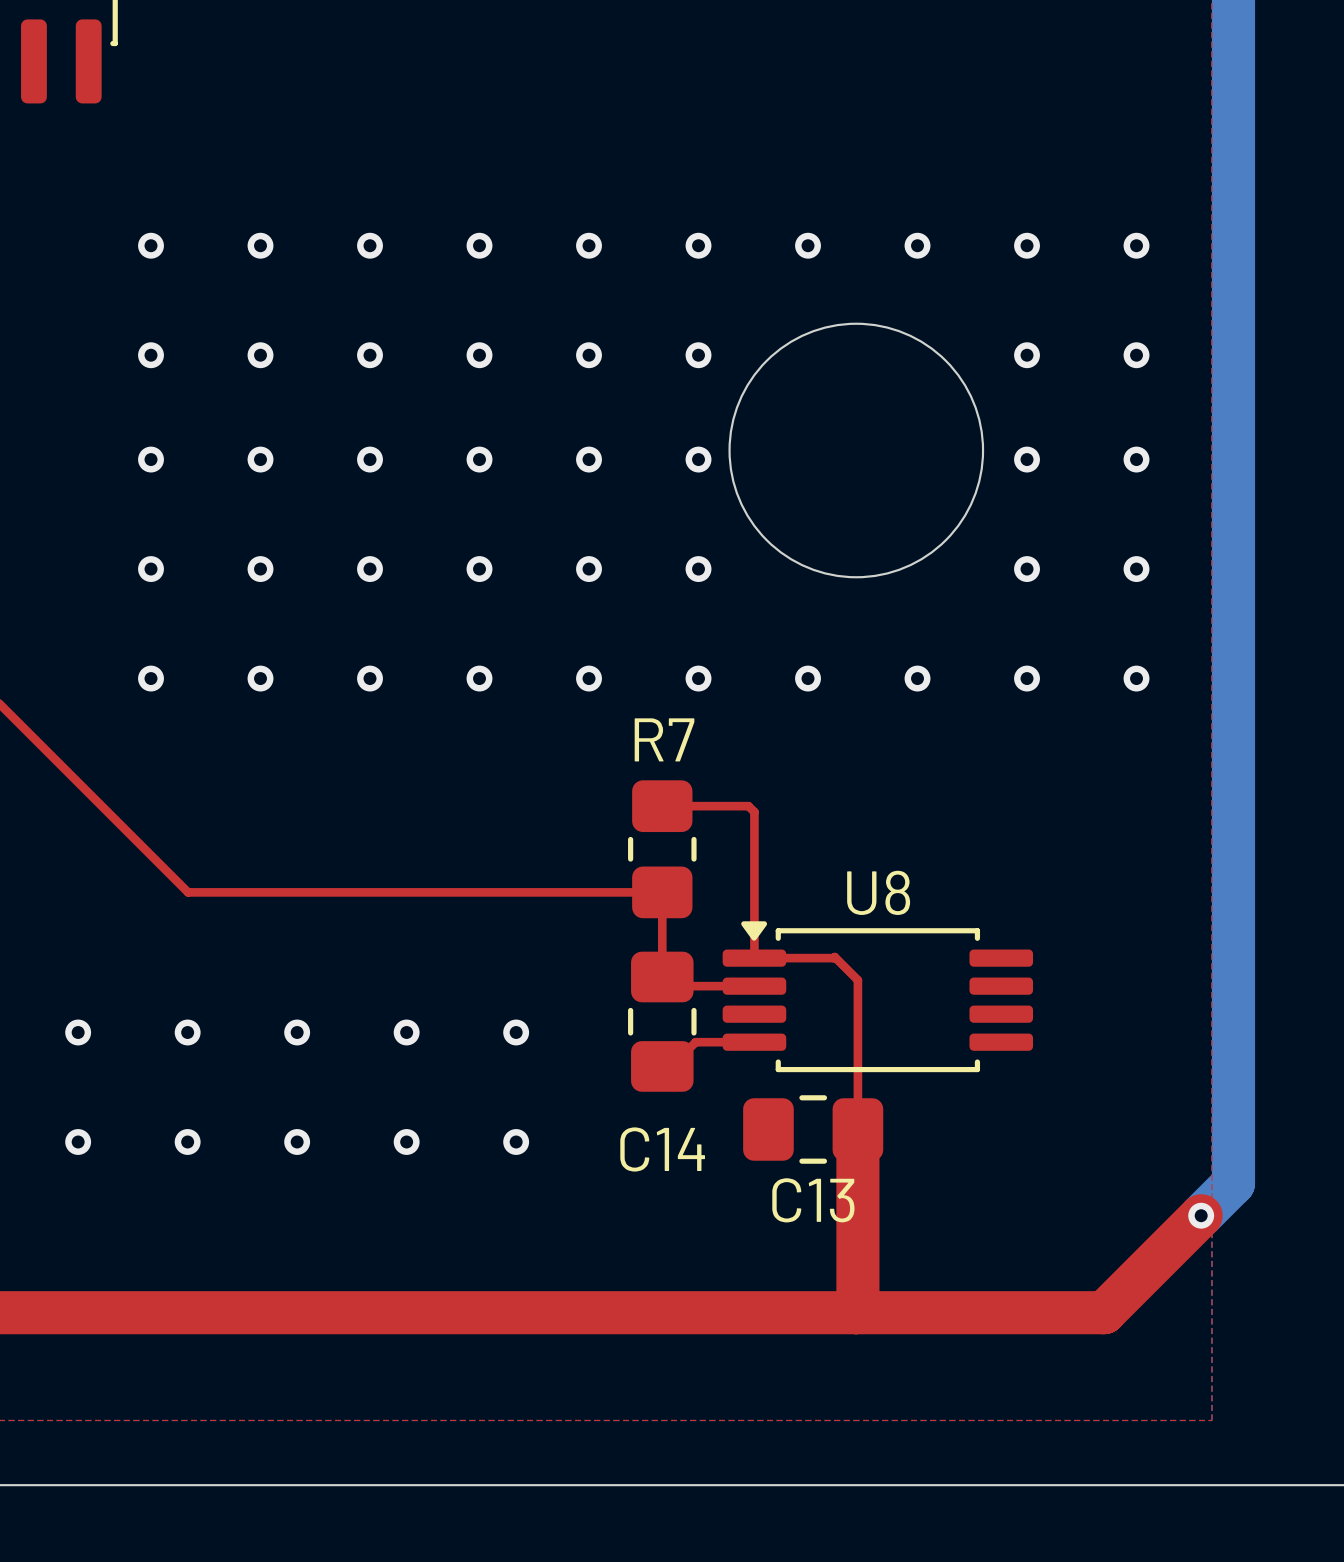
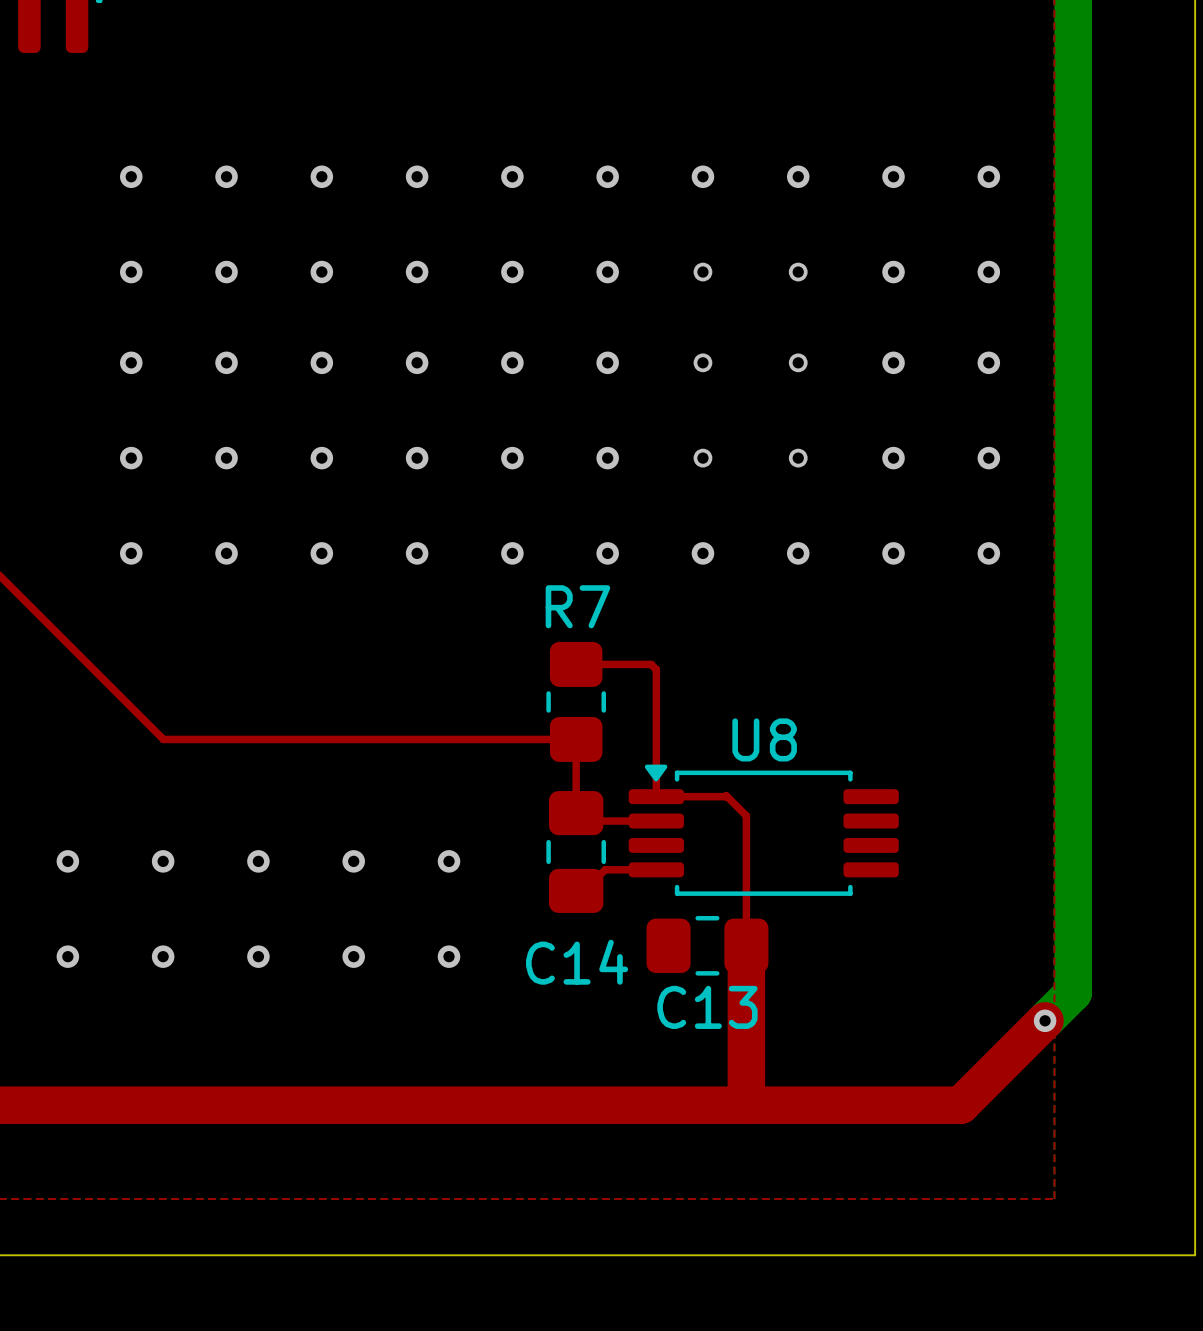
round board edge: [728, 322, 985, 579] -> none
via: none -> (702, 272)
via: none -> (798, 272)
via: none -> (702, 362)
via: none -> (798, 362)
via: none -> (702, 458)
via: none -> (798, 458)

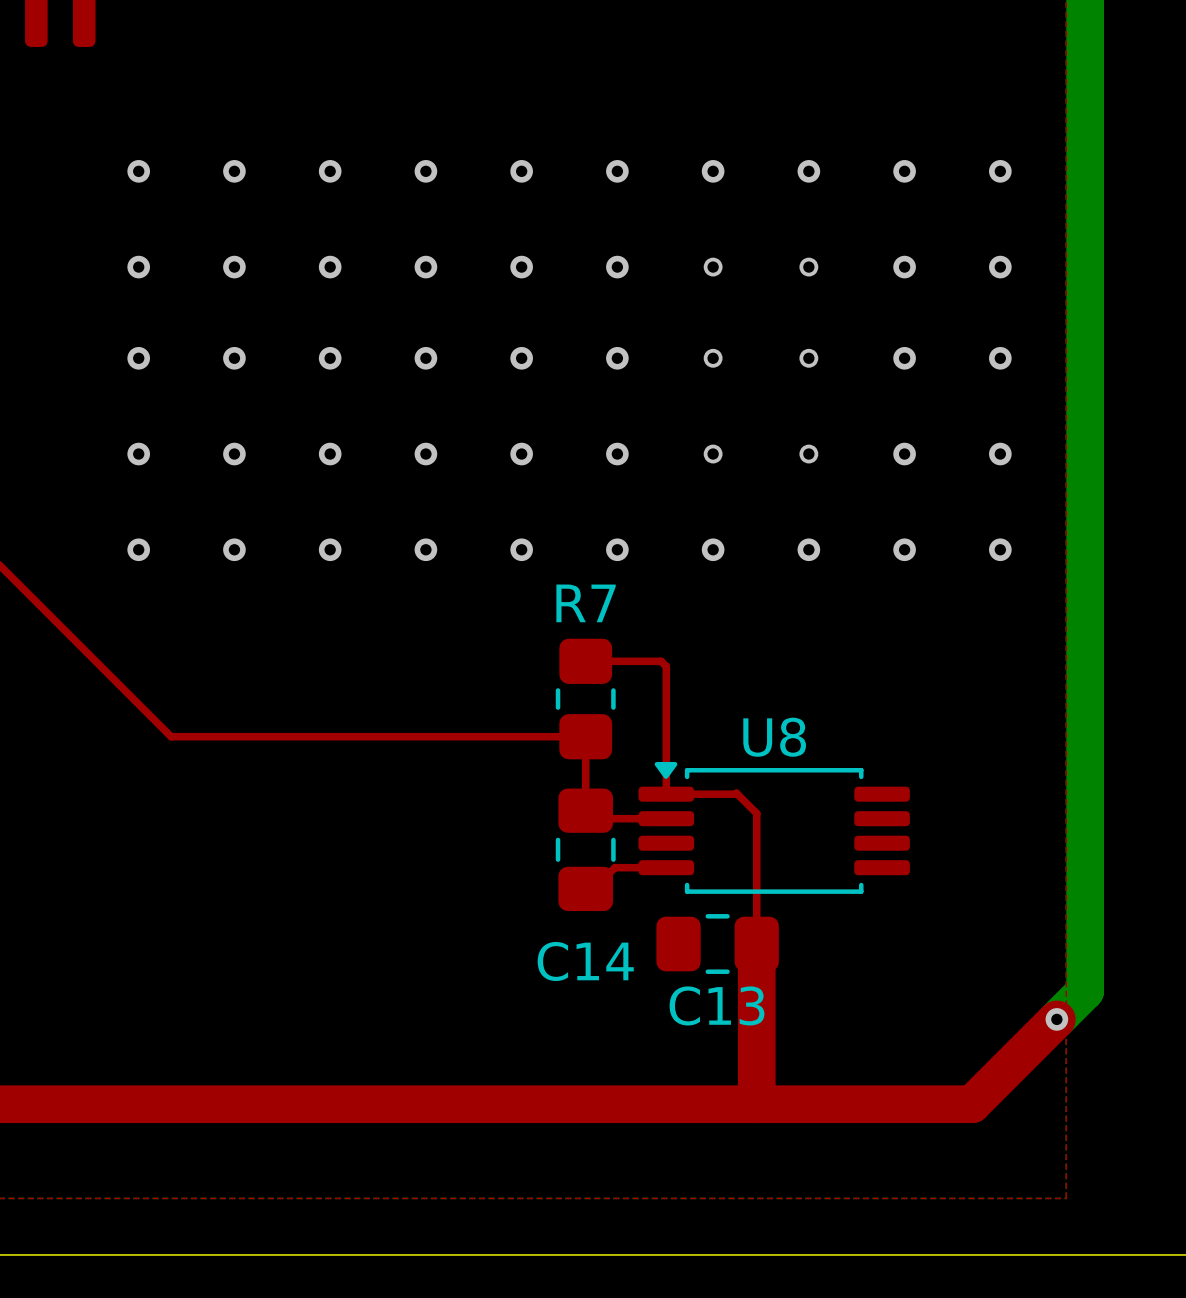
via: (67, 861) -> none
via: (163, 861) -> none
via: (258, 861) -> none
via: (353, 861) -> none
via: (448, 861) -> none
via: (67, 956) -> none
via: (163, 956) -> none
via: (258, 956) -> none
via: (353, 956) -> none
via: (448, 956) -> none

